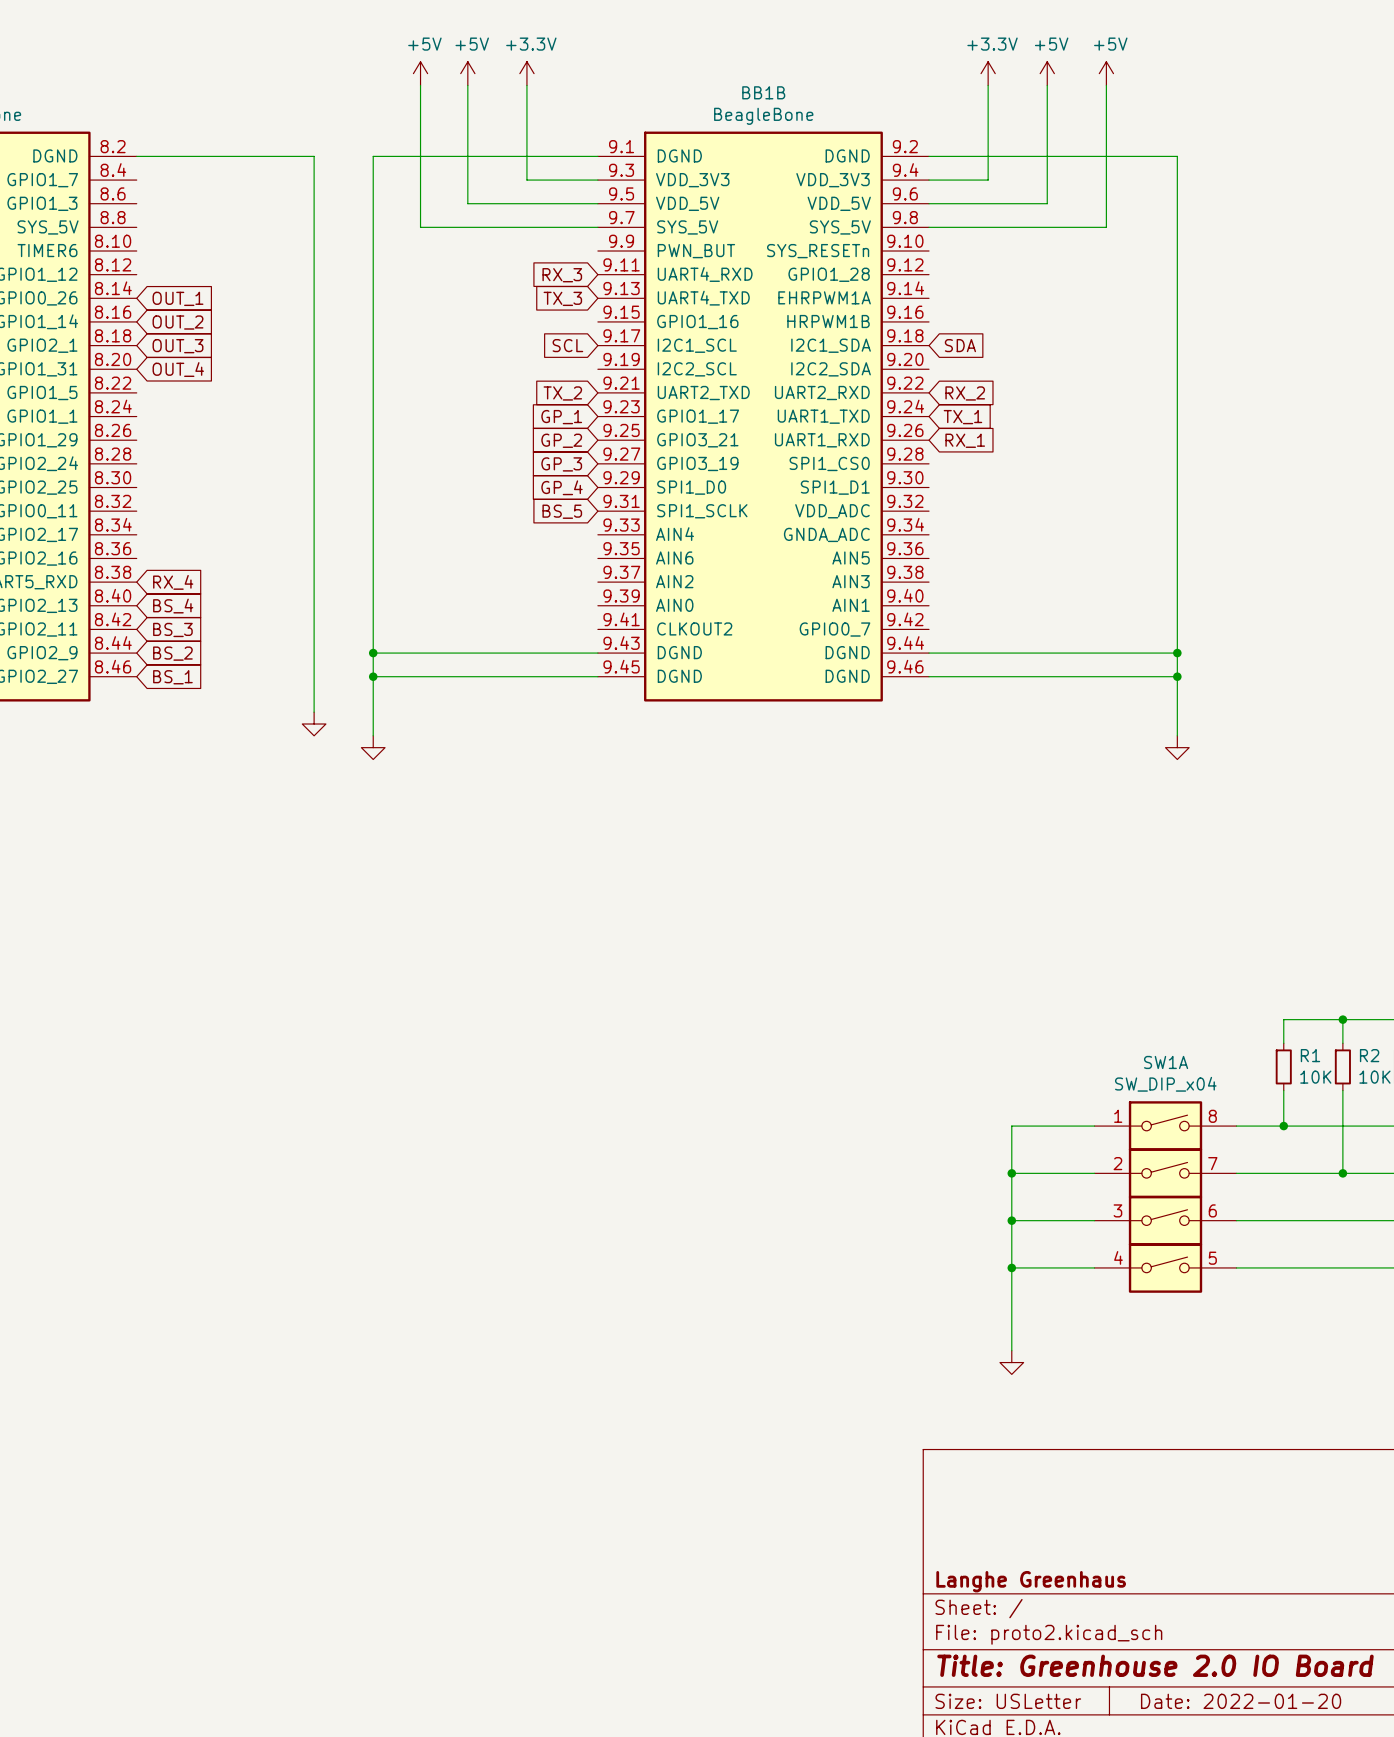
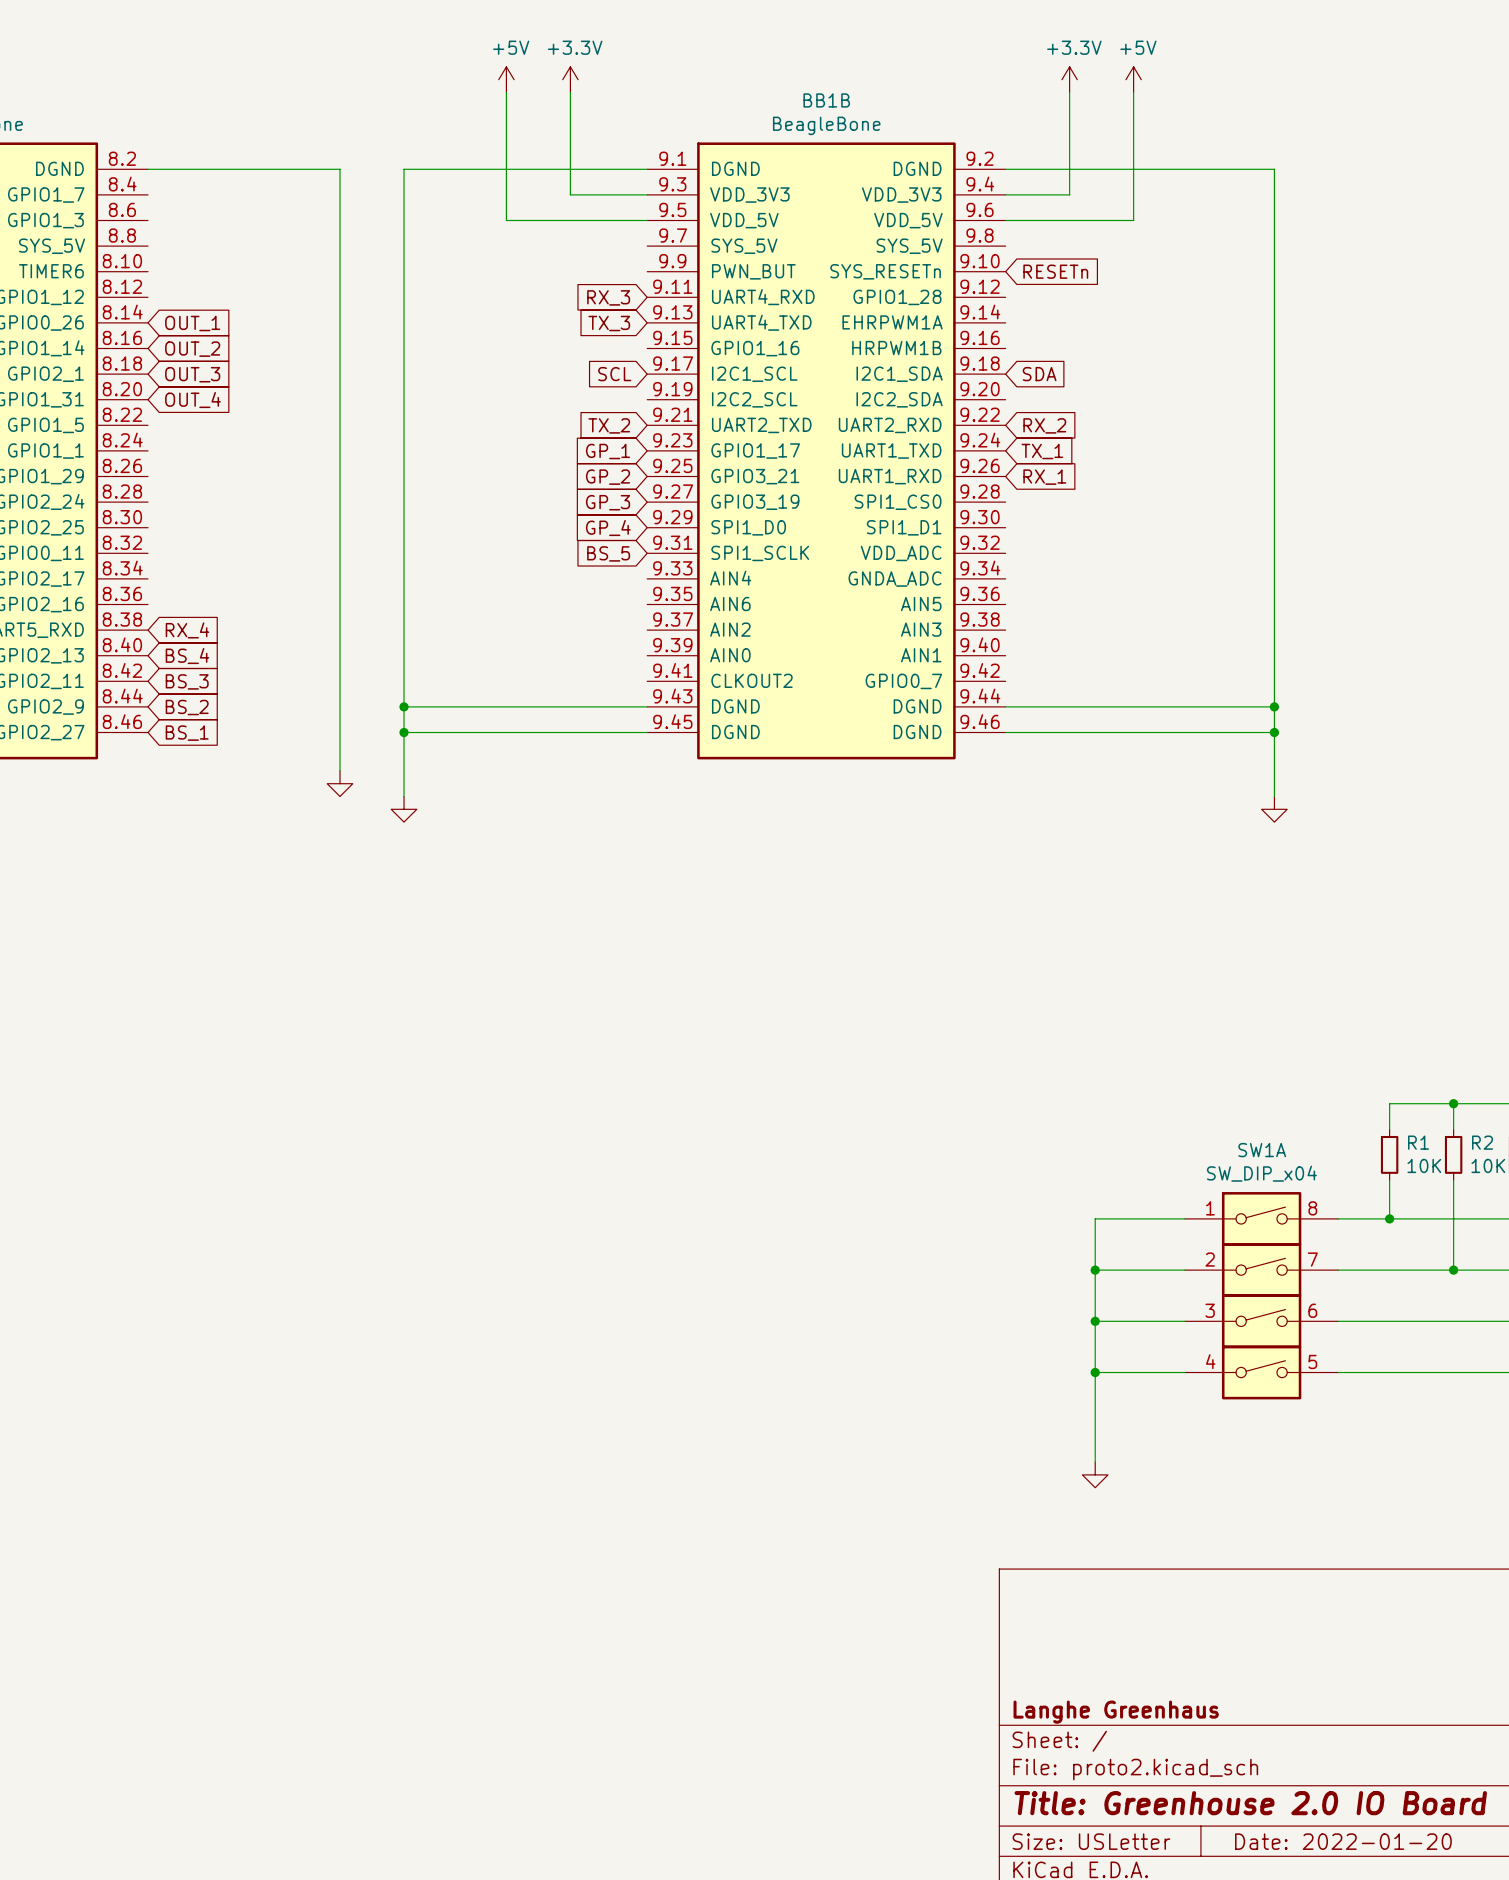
power symbol: +5V (420, 73) -> none
power symbol: +5V (1106, 73) -> none
wire: (420, 85) (420, 227) (597, 227) -> none
wire: (1106, 85) (1106, 227) (929, 227) -> none
global label: none -> RESETn (1055, 271)

